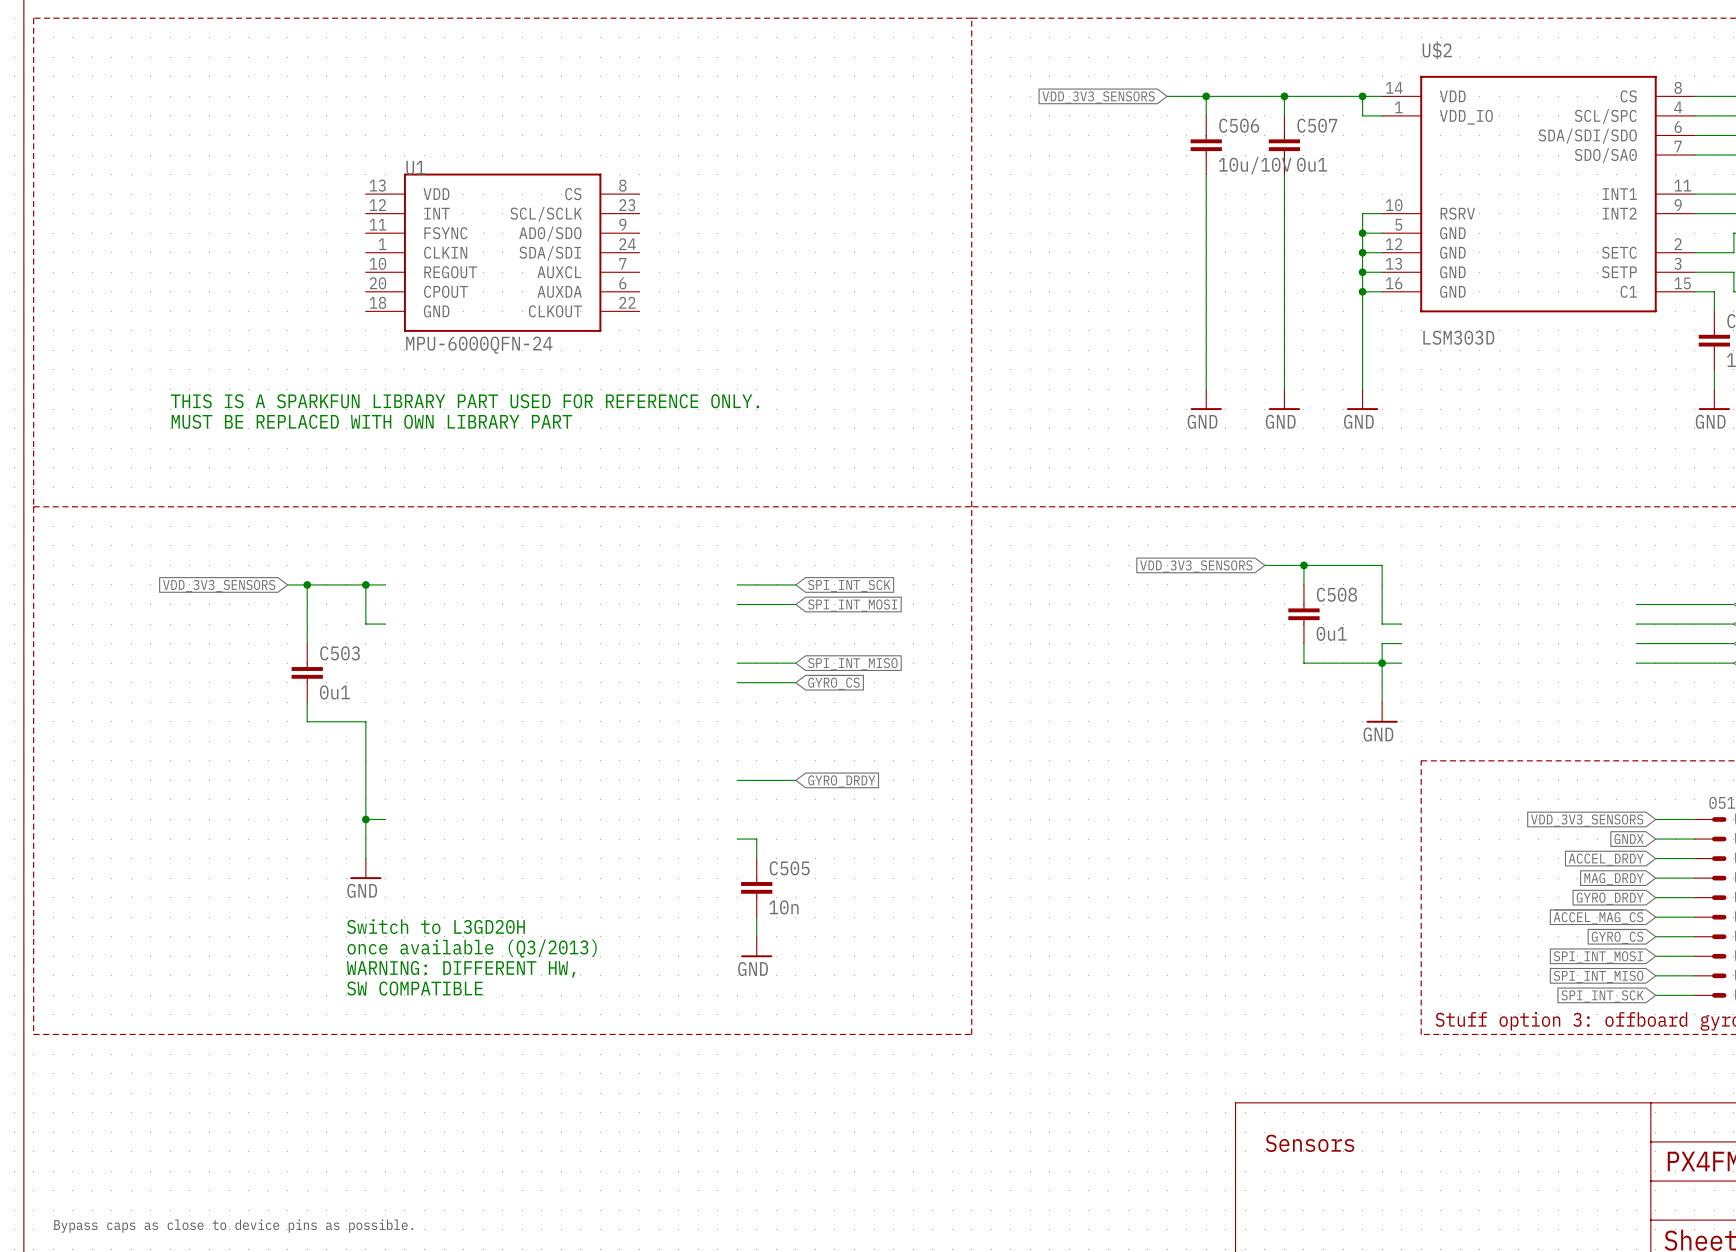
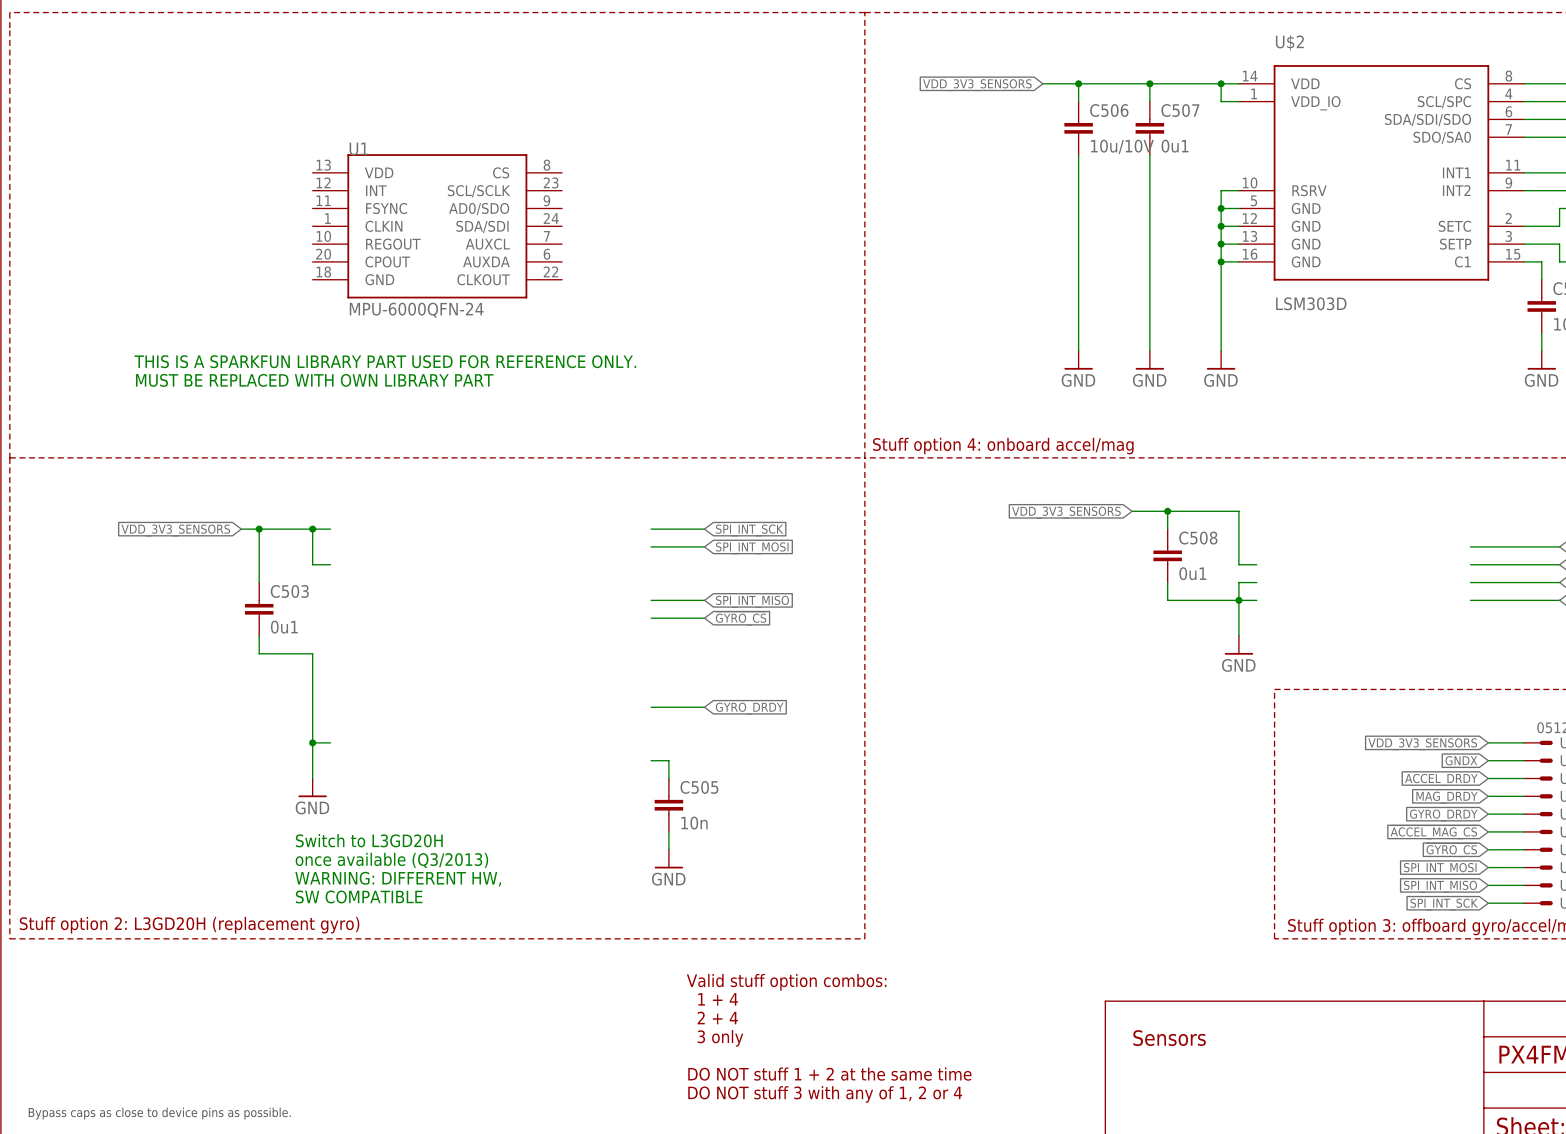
text: none -> Stuff option 4: onboard accel/mag (1003, 446)
text: none -> Stuff option 2: L3GD20H (replacement gyro) (189, 925)
text: none -> Valid stuff option combos: (786, 982)
text: none -> 1 + 4 (718, 999)
text: none -> 2 + 4 (717, 1017)
text: none -> 3 only (720, 1038)
text: none -> DO NOT stuff 1 + 2 at the same time (829, 1074)
text: none -> DO NOT stuff 3 with any of 1, 2 or 4 (825, 1094)

